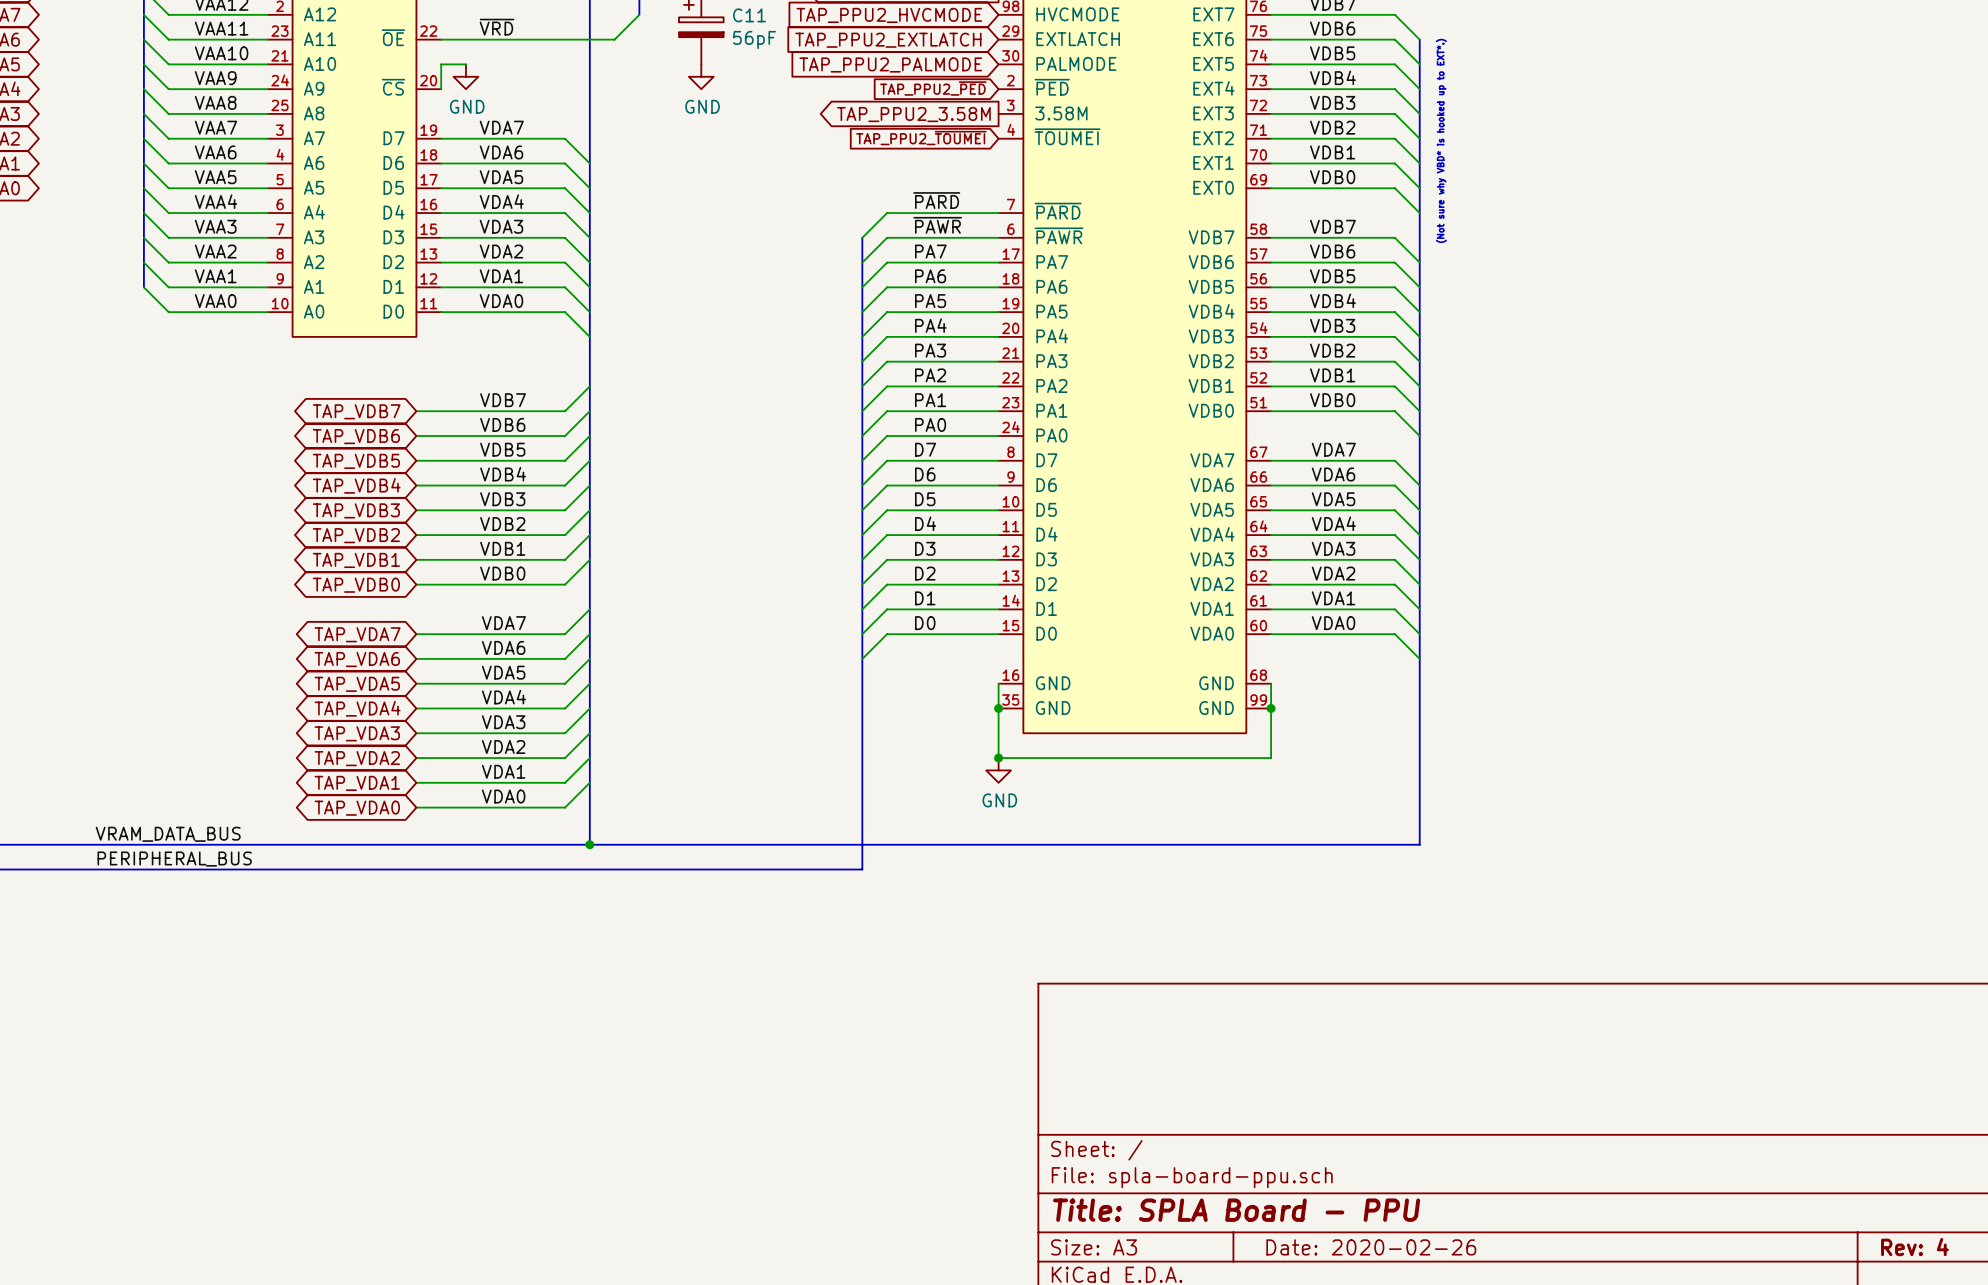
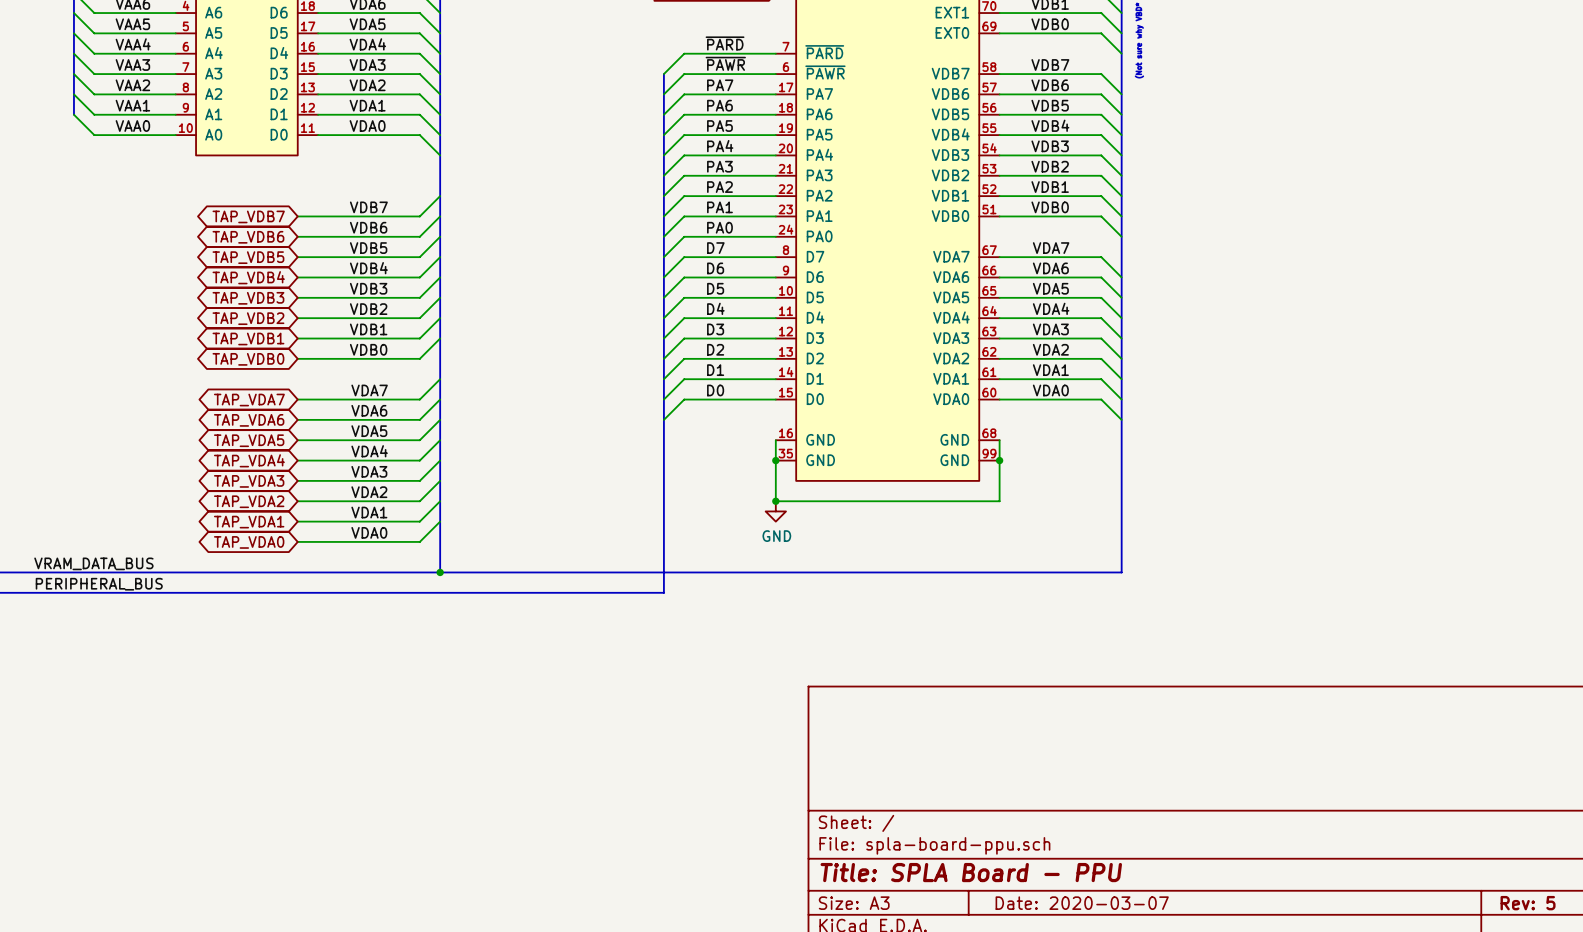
title block: Date: 2020-02-26 (1371, 1247) -> Date: 2020-03-07 (1082, 903)
title block: Rev: 4 (1914, 1247) -> Rev: 5 (1528, 903)

